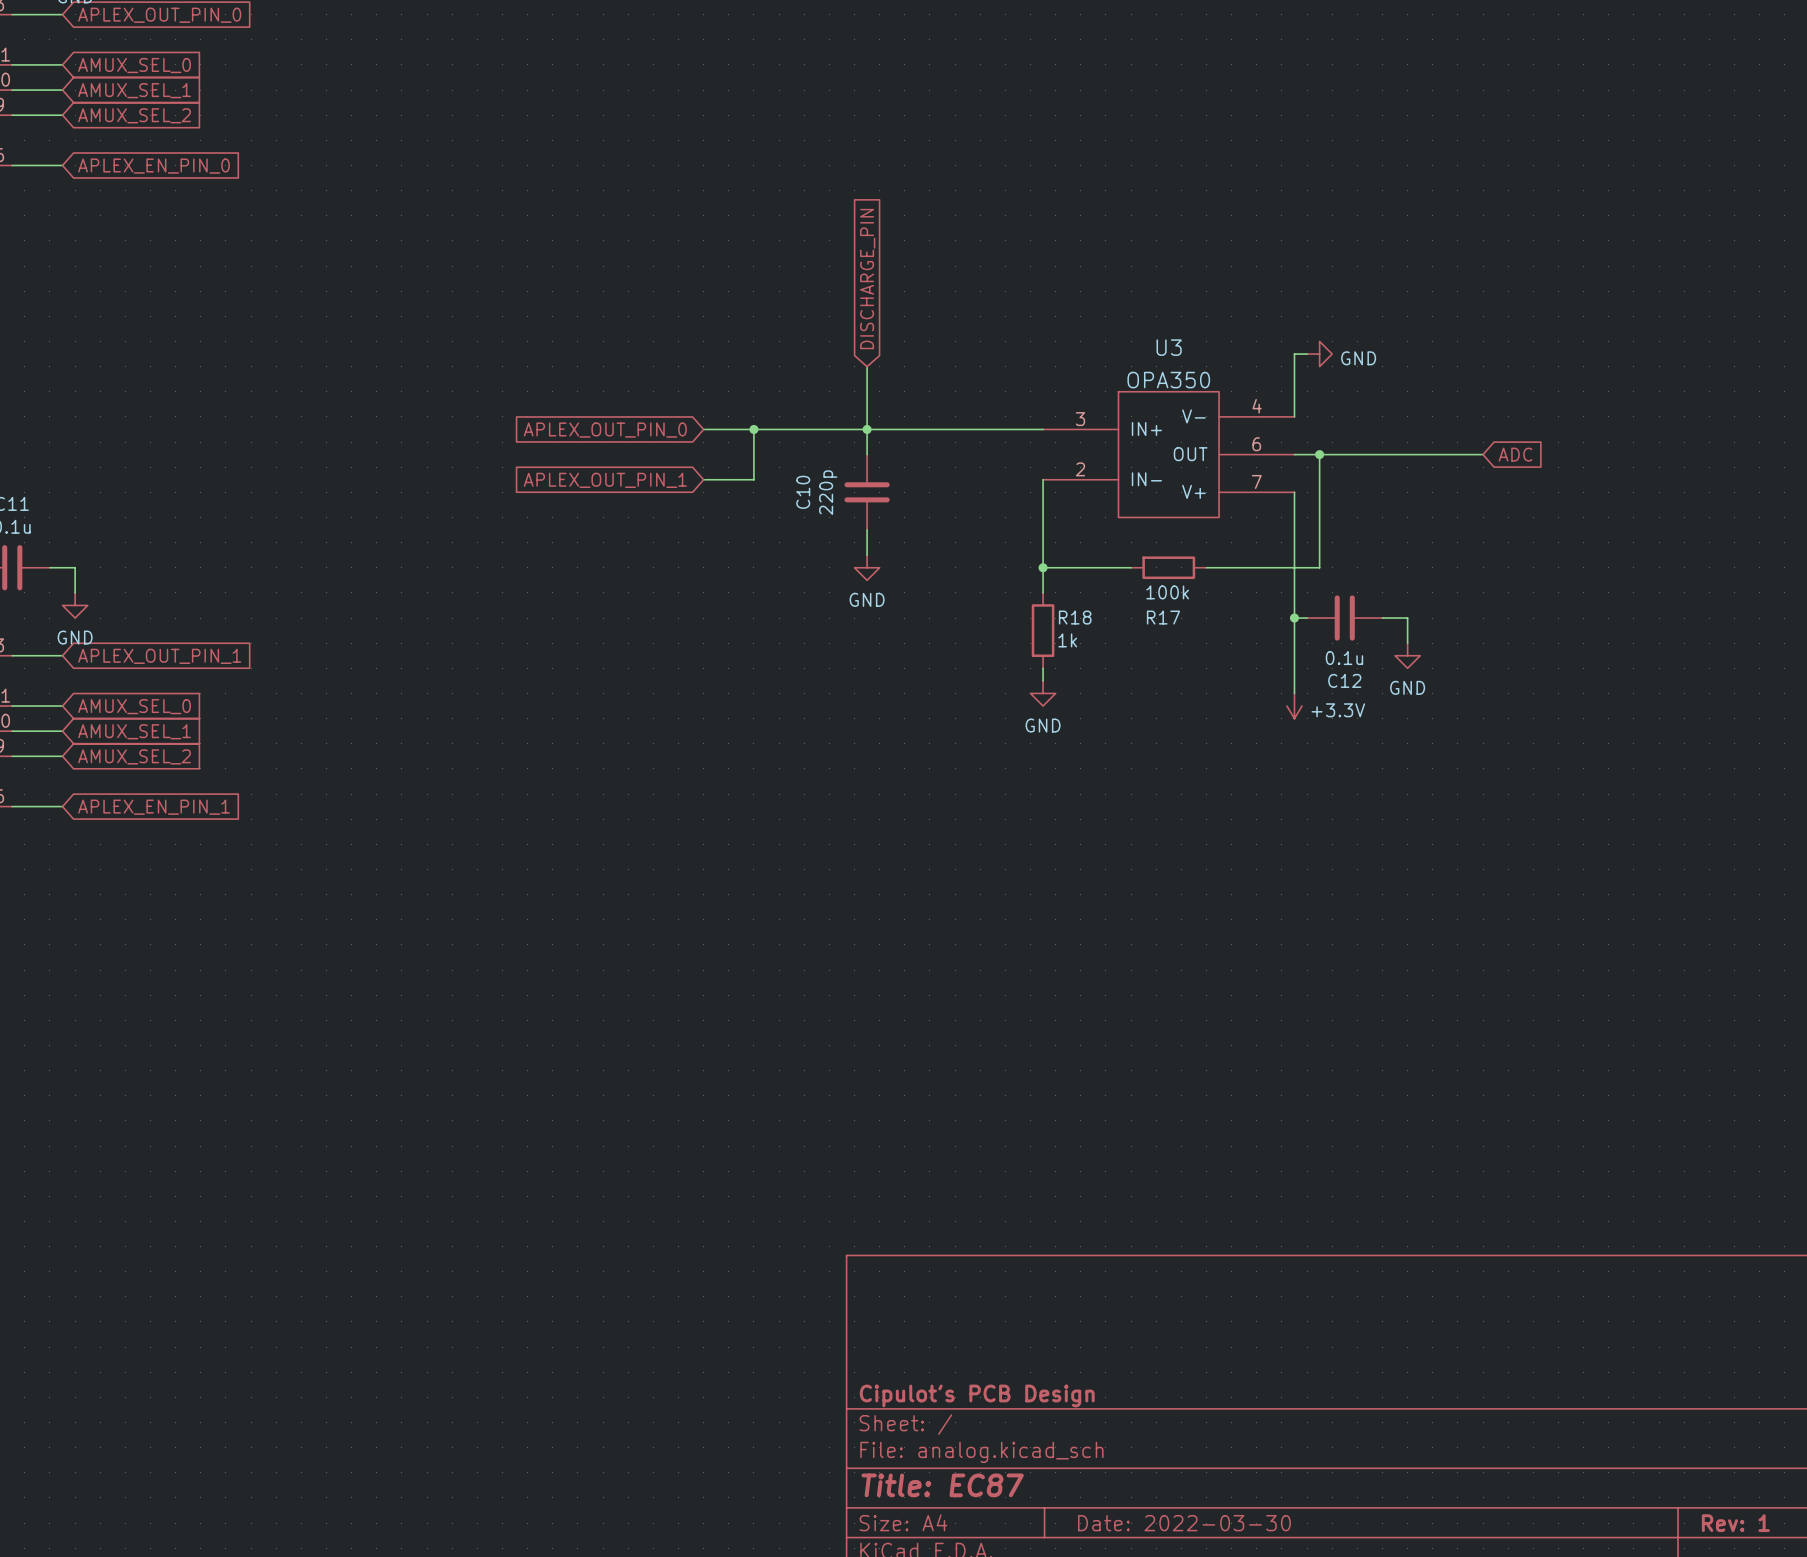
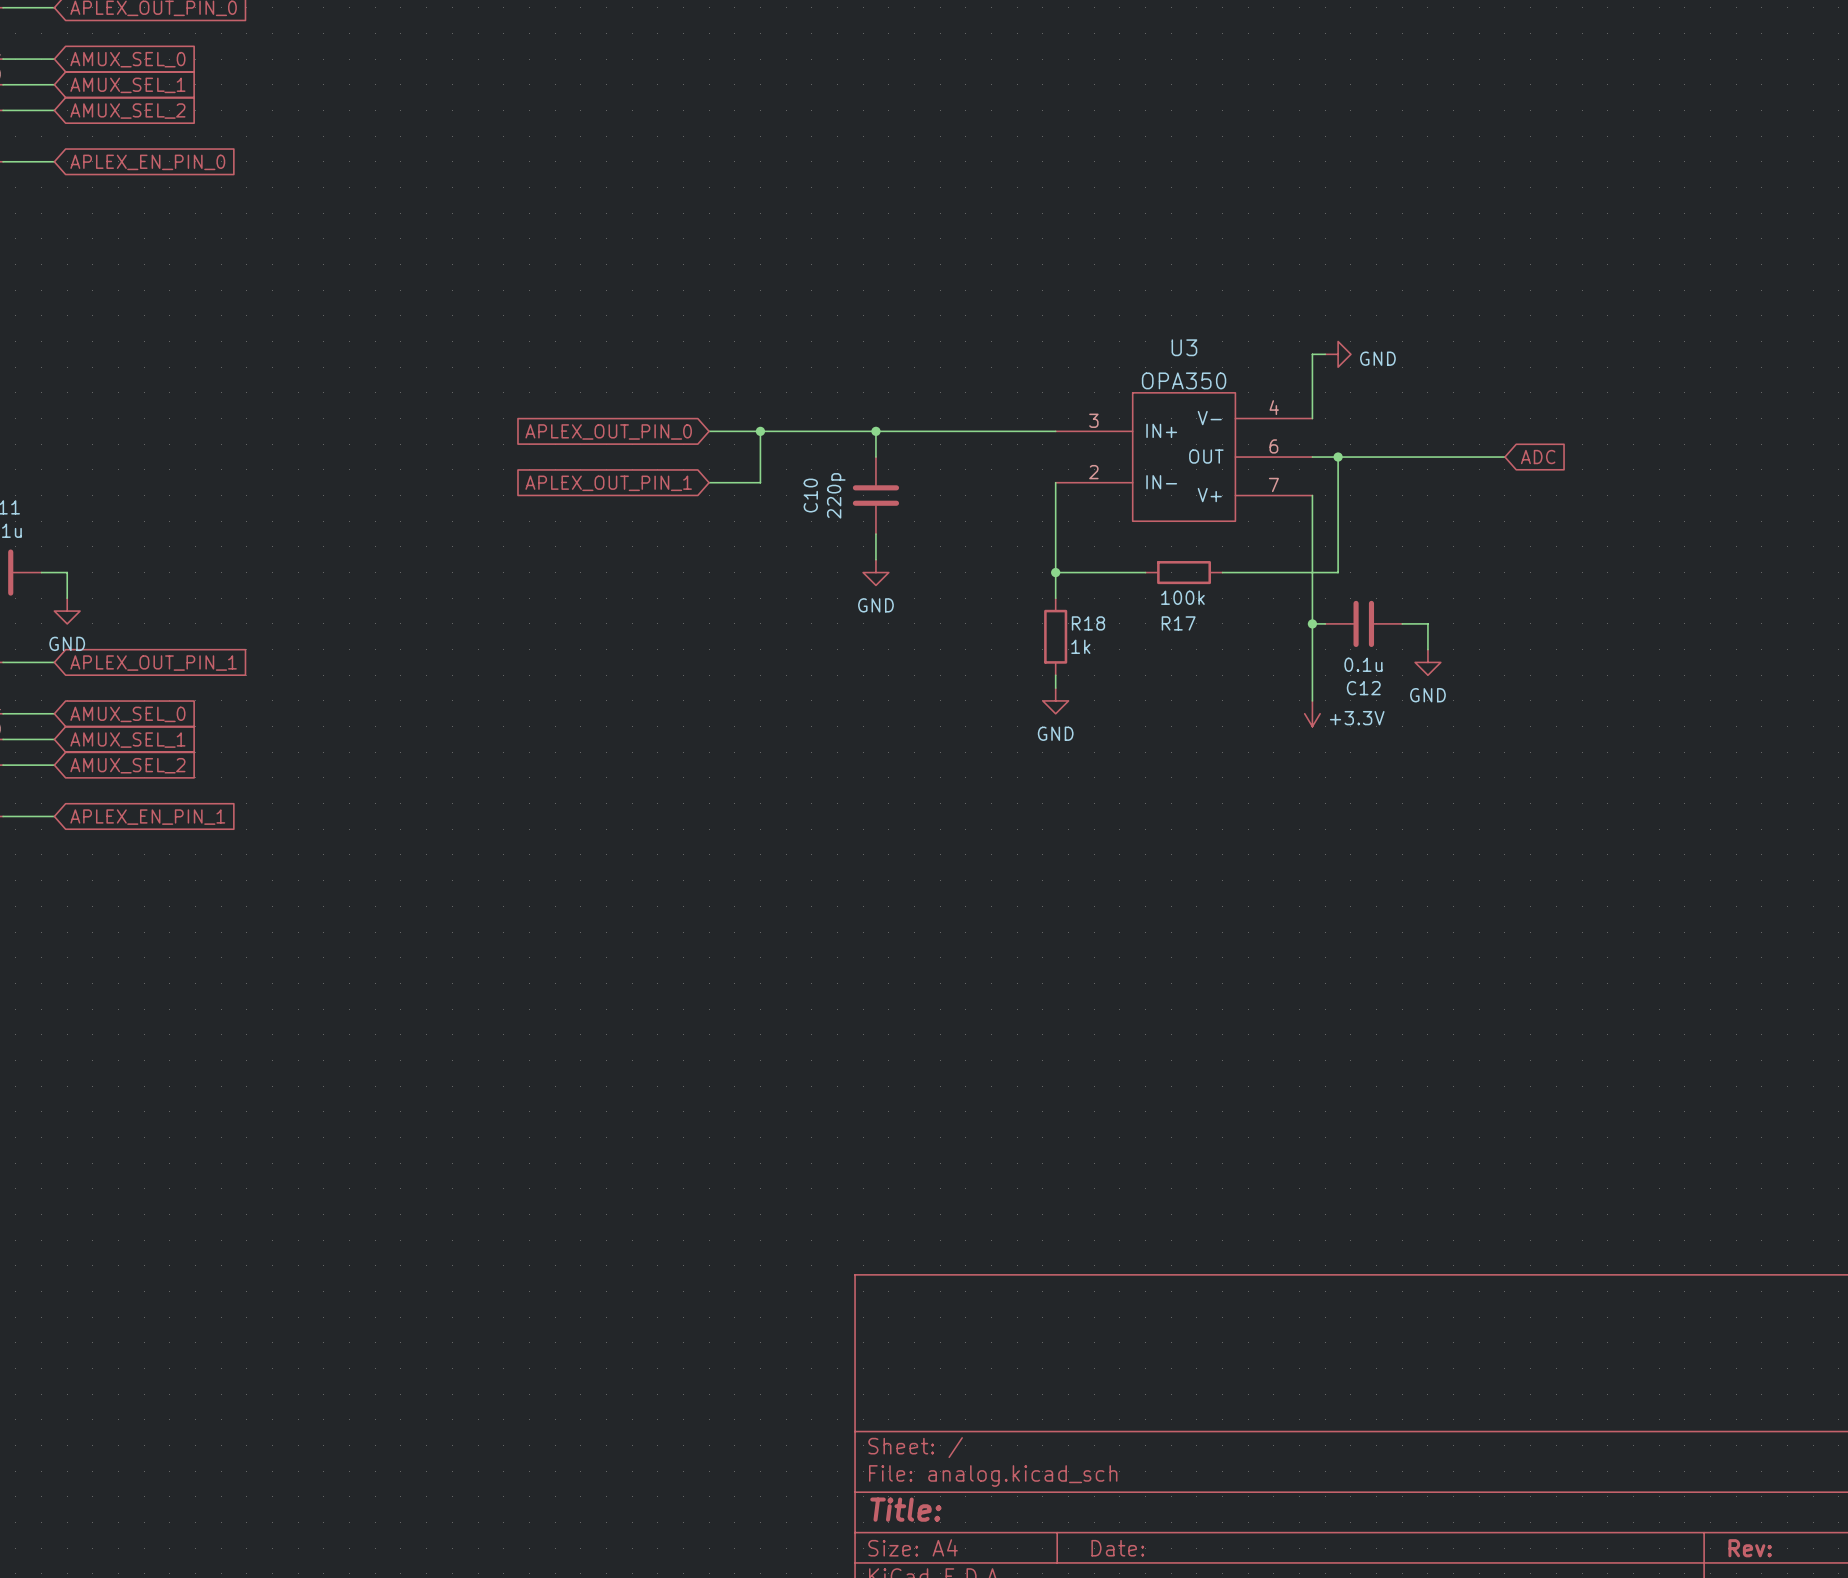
global label: DISCHARGE_PIN (867, 279) -> none
wire: (867, 366) (867, 429) -> none
title block: Cipulot's PCB Design (977, 1395) -> none
title block: Title: EC87 (942, 1485) -> Title: (905, 1509)
title block: Date: 2022-03-30 (1184, 1523) -> Date: (1117, 1548)
title block: Rev: 1 (1735, 1523) -> Rev: (1750, 1548)

